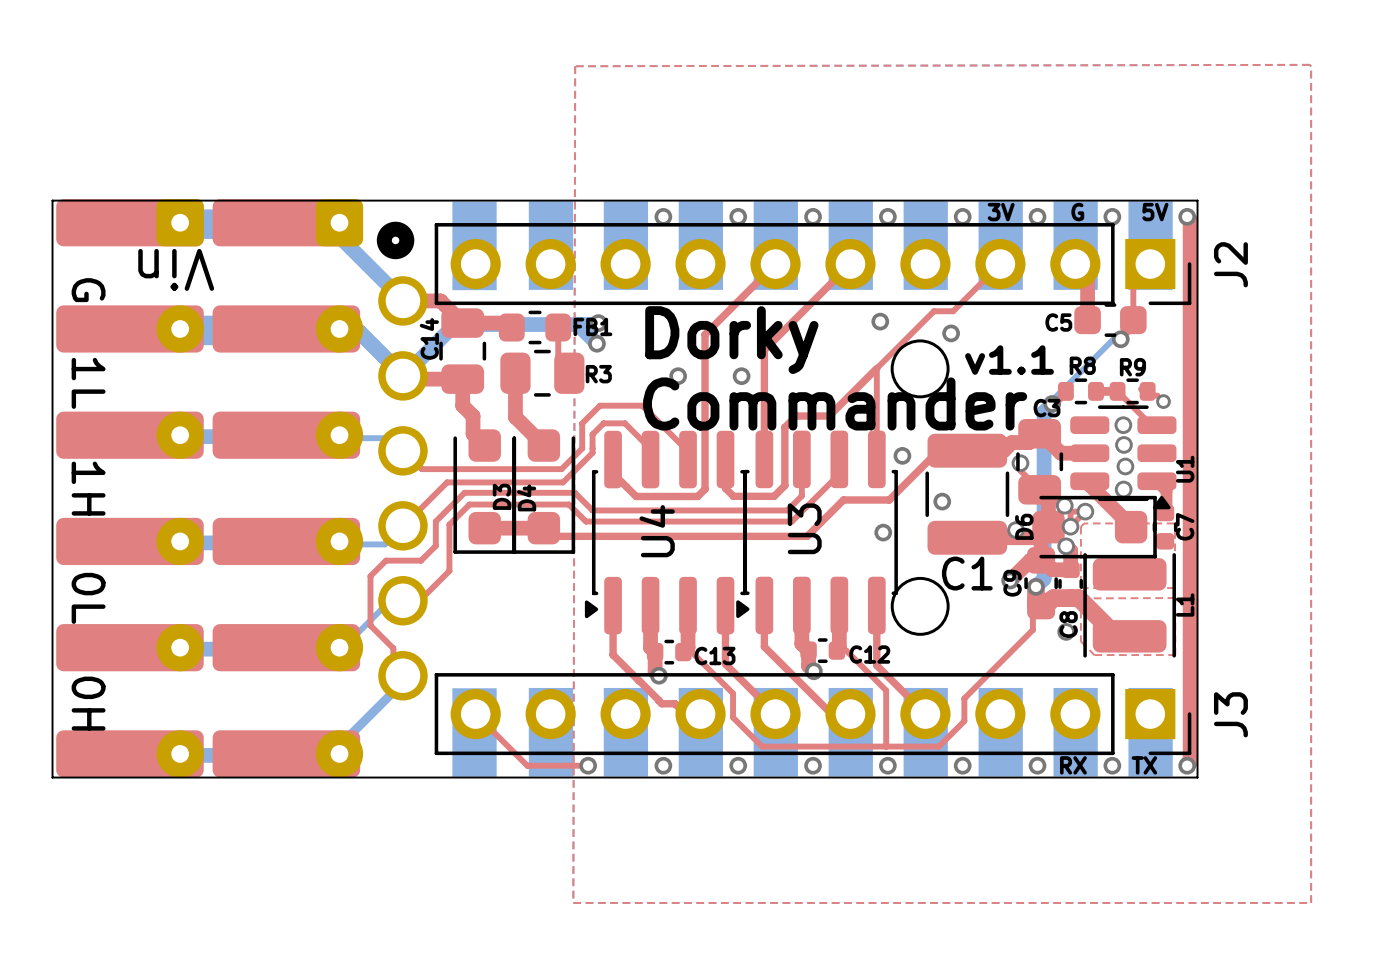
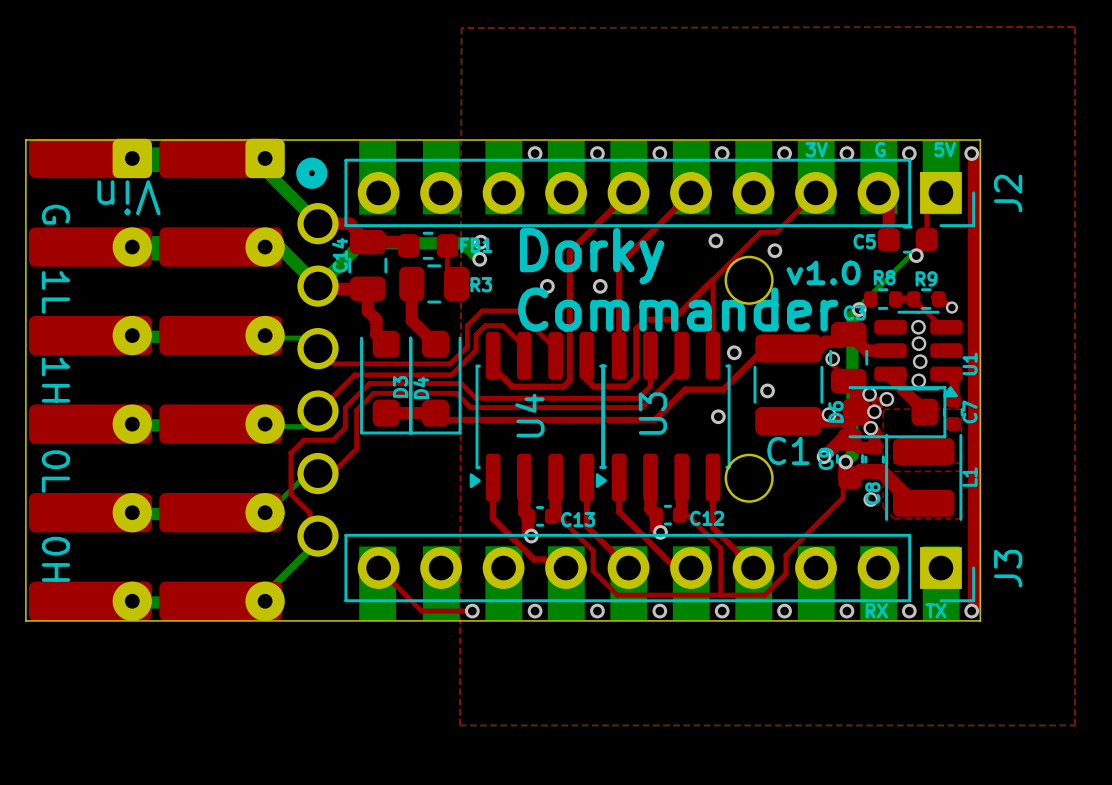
text: v1.1 (1009, 360) -> v1.0 (823, 272)

